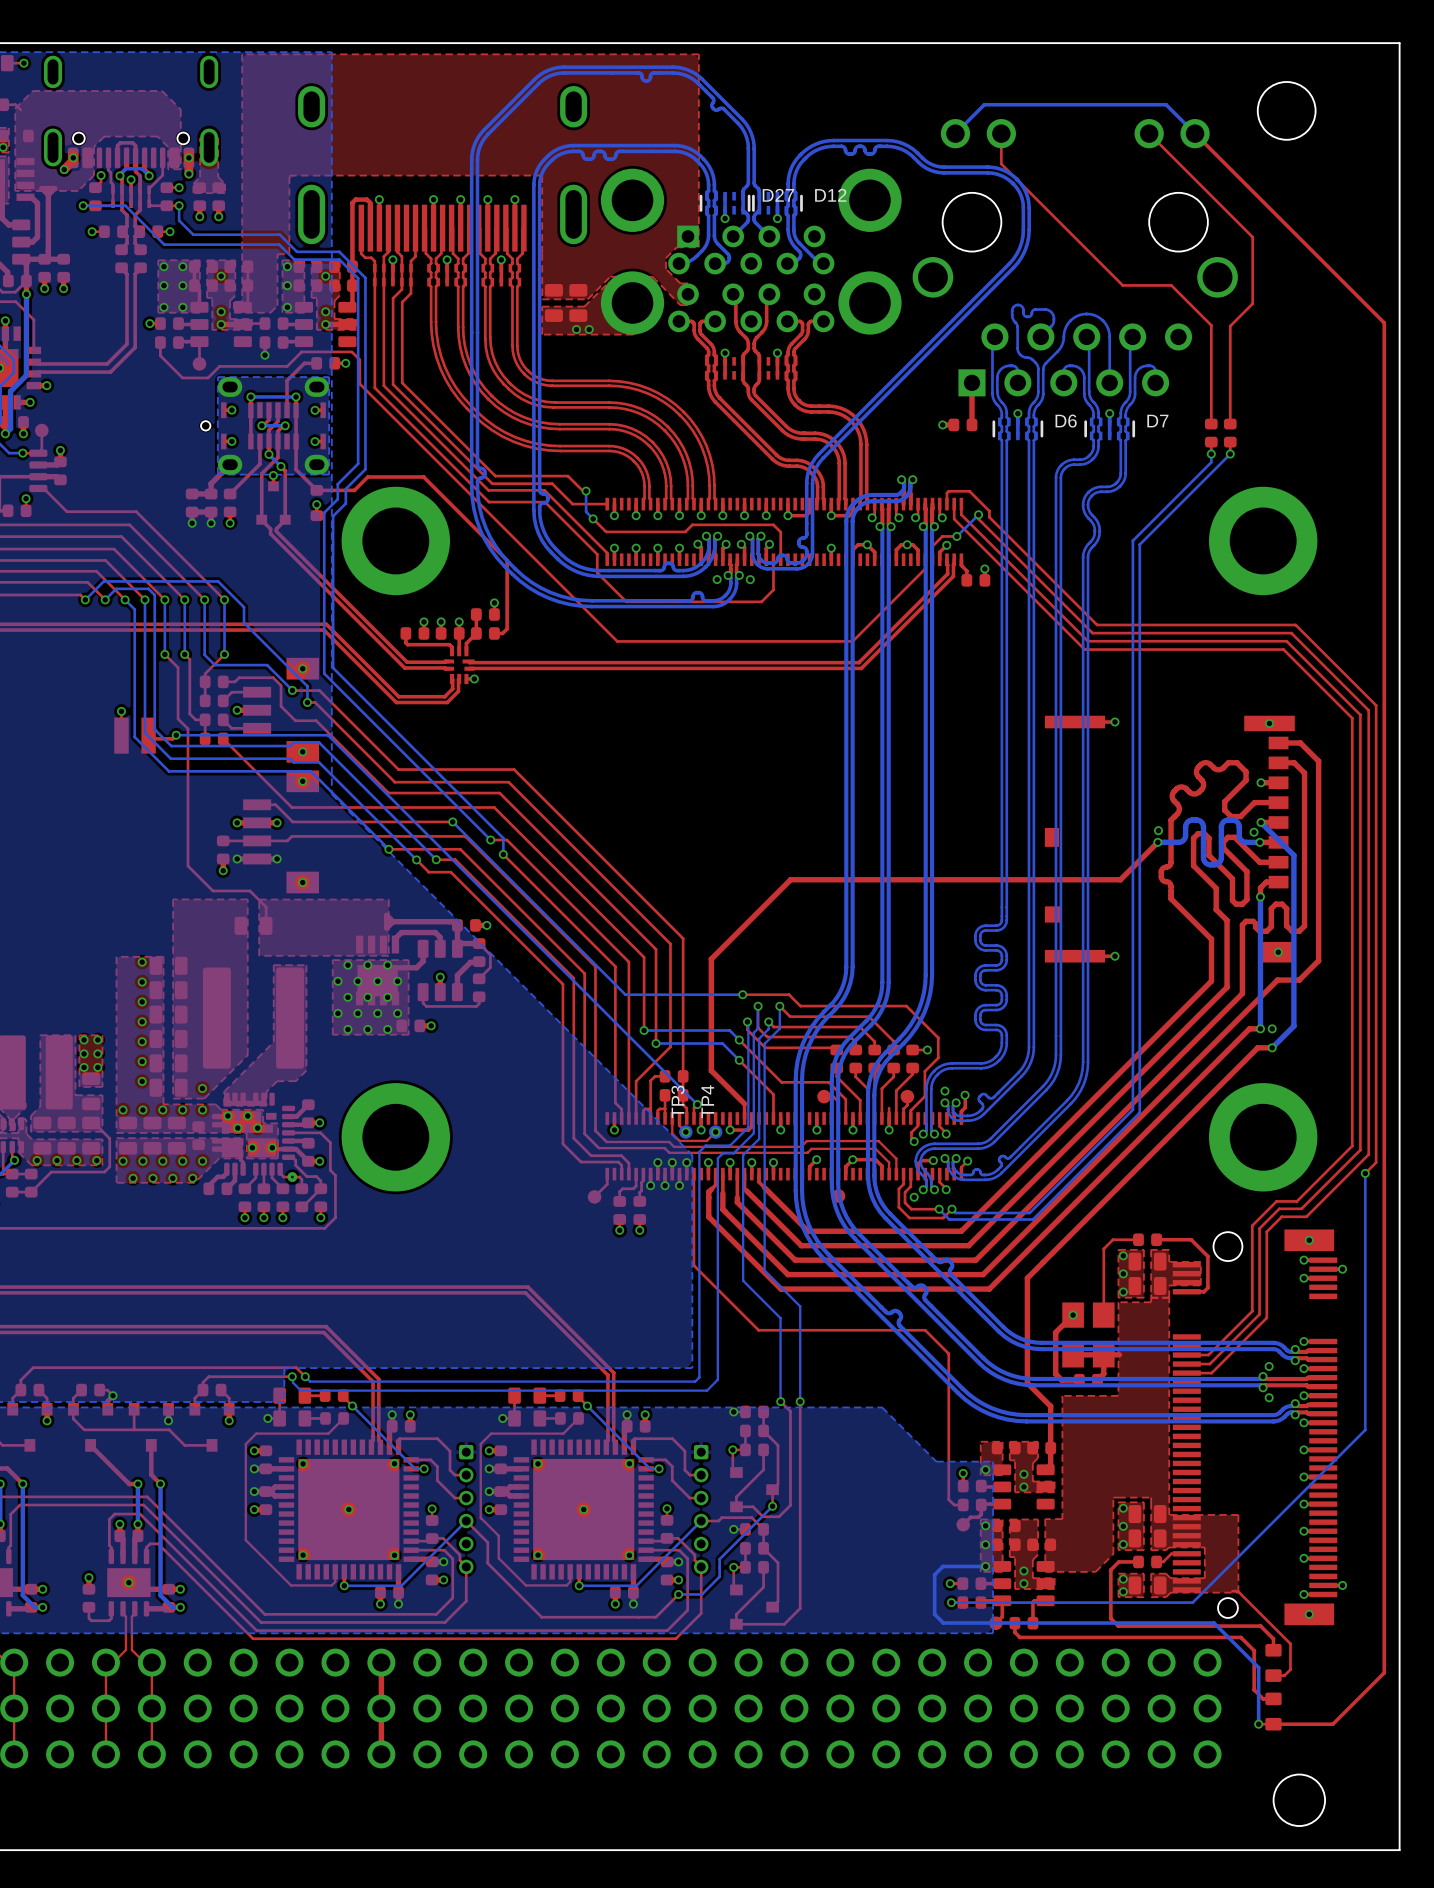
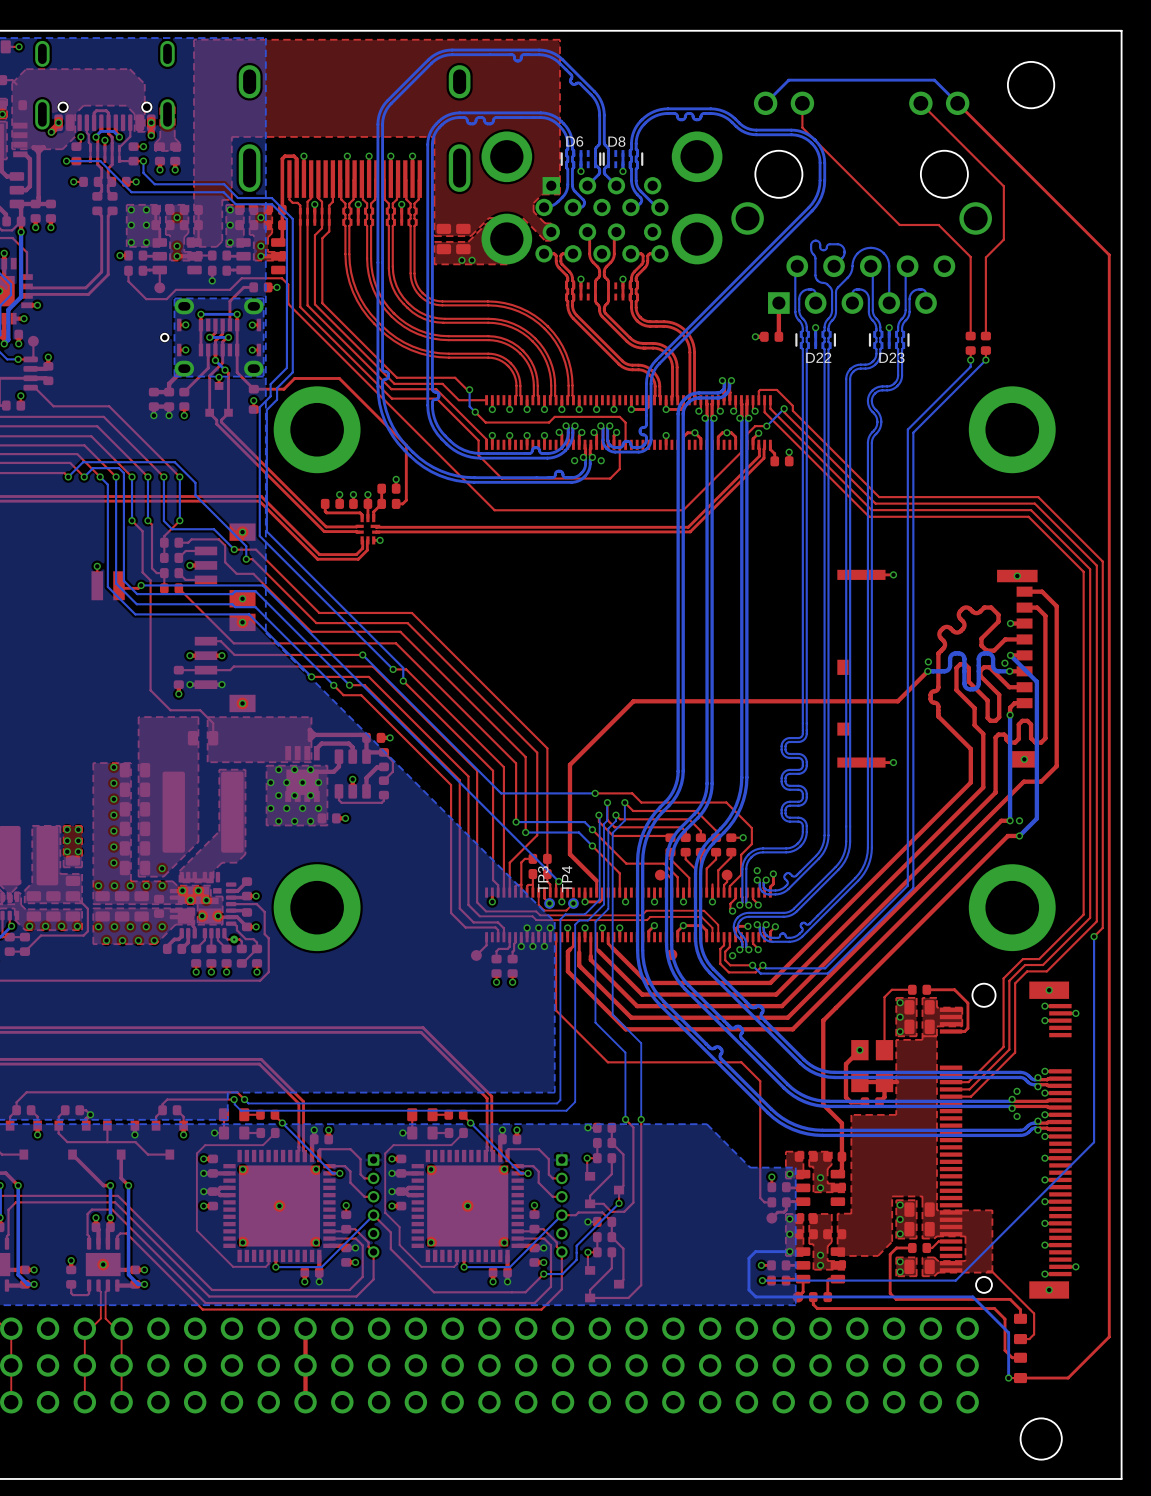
D27 name: D27 (778, 195) -> D6 (574, 141)
D12 name: D12 (830, 195) -> D8 (616, 141)
D6 name: D6 (1066, 421) -> D22 (818, 357)
D7 name: D7 (1157, 421) -> D23 (891, 357)

